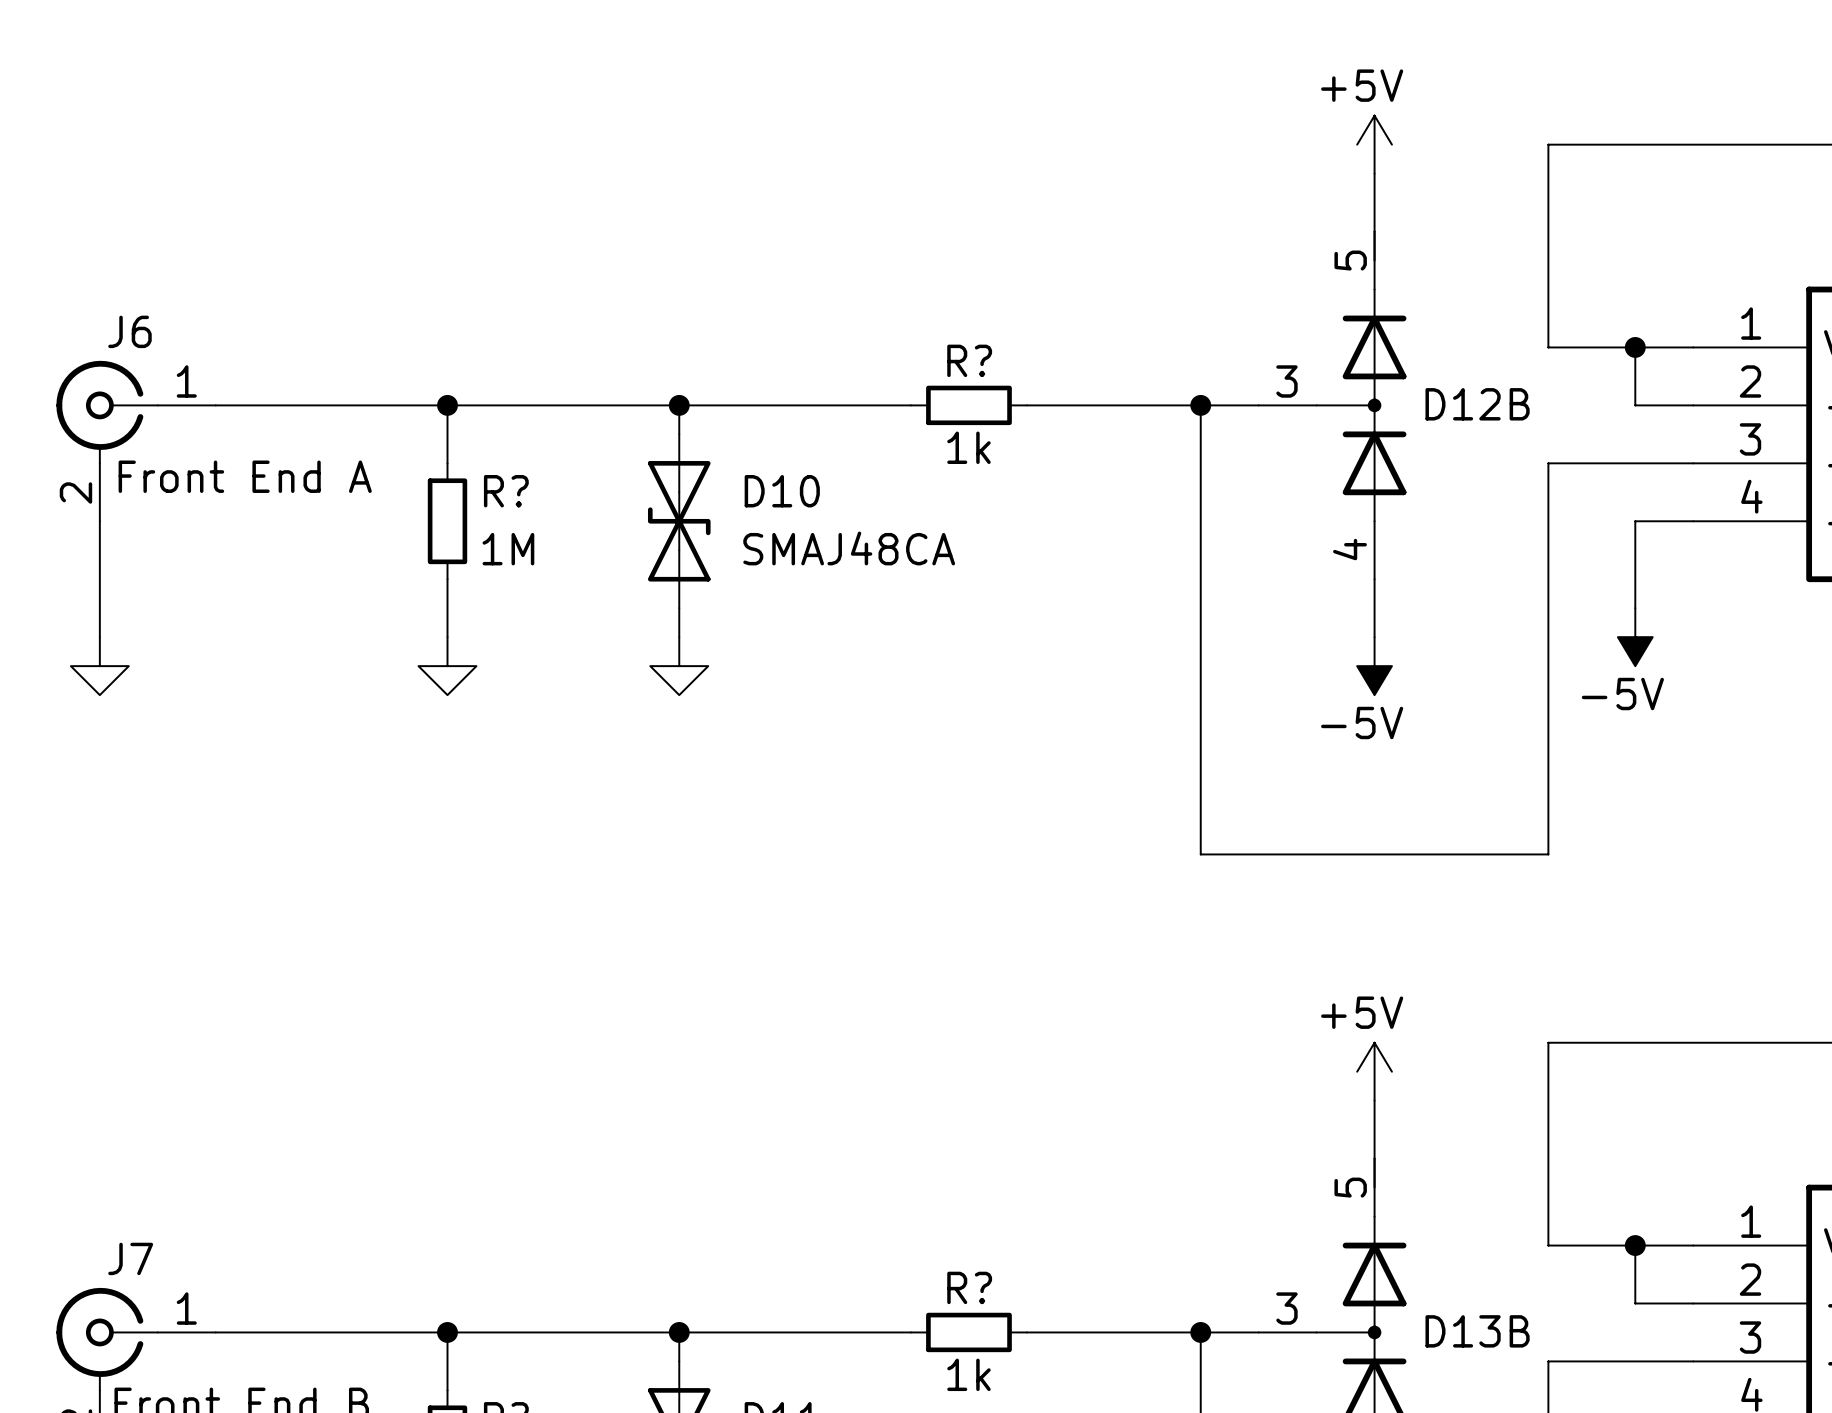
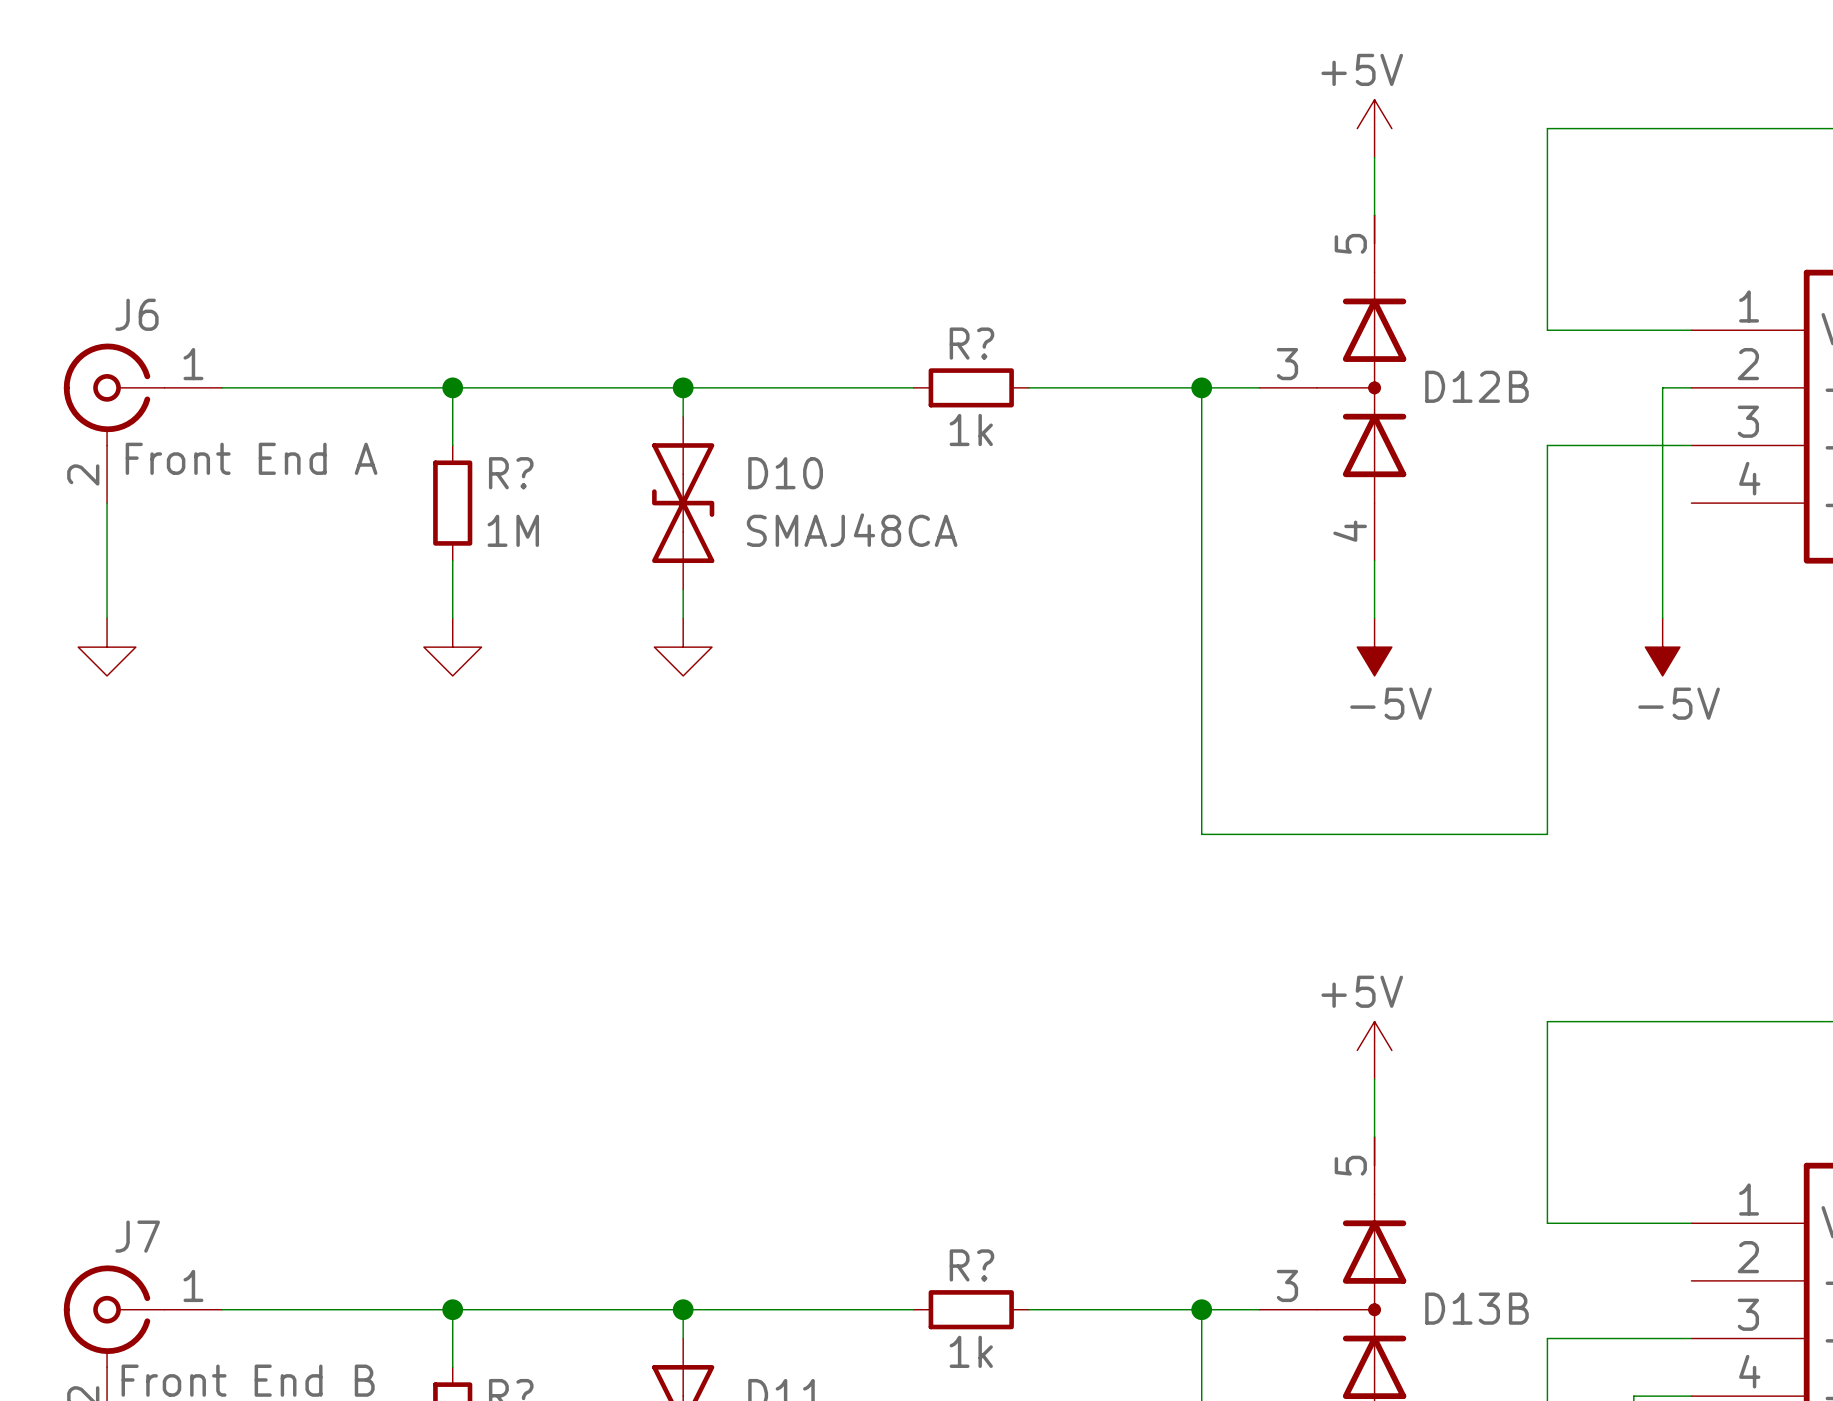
wire: (1635, 347) (1635, 405) (1664, 405) -> (1662, 618) (1662, 387)
junction: (1635, 347) -> none
wire: (1693, 521) (1635, 521) (1635, 608) -> none
power symbol position: -5V (1635, 637) -> -5V (1662, 647)
power symbol text position: -5V (1622, 694) -> -5V (1679, 703)
power symbol text position: -5V (1362, 722) -> -5V (1391, 703)
wire: (1635, 1245) (1635, 1303) (1693, 1303) -> none
junction: (1635, 1245) -> none

